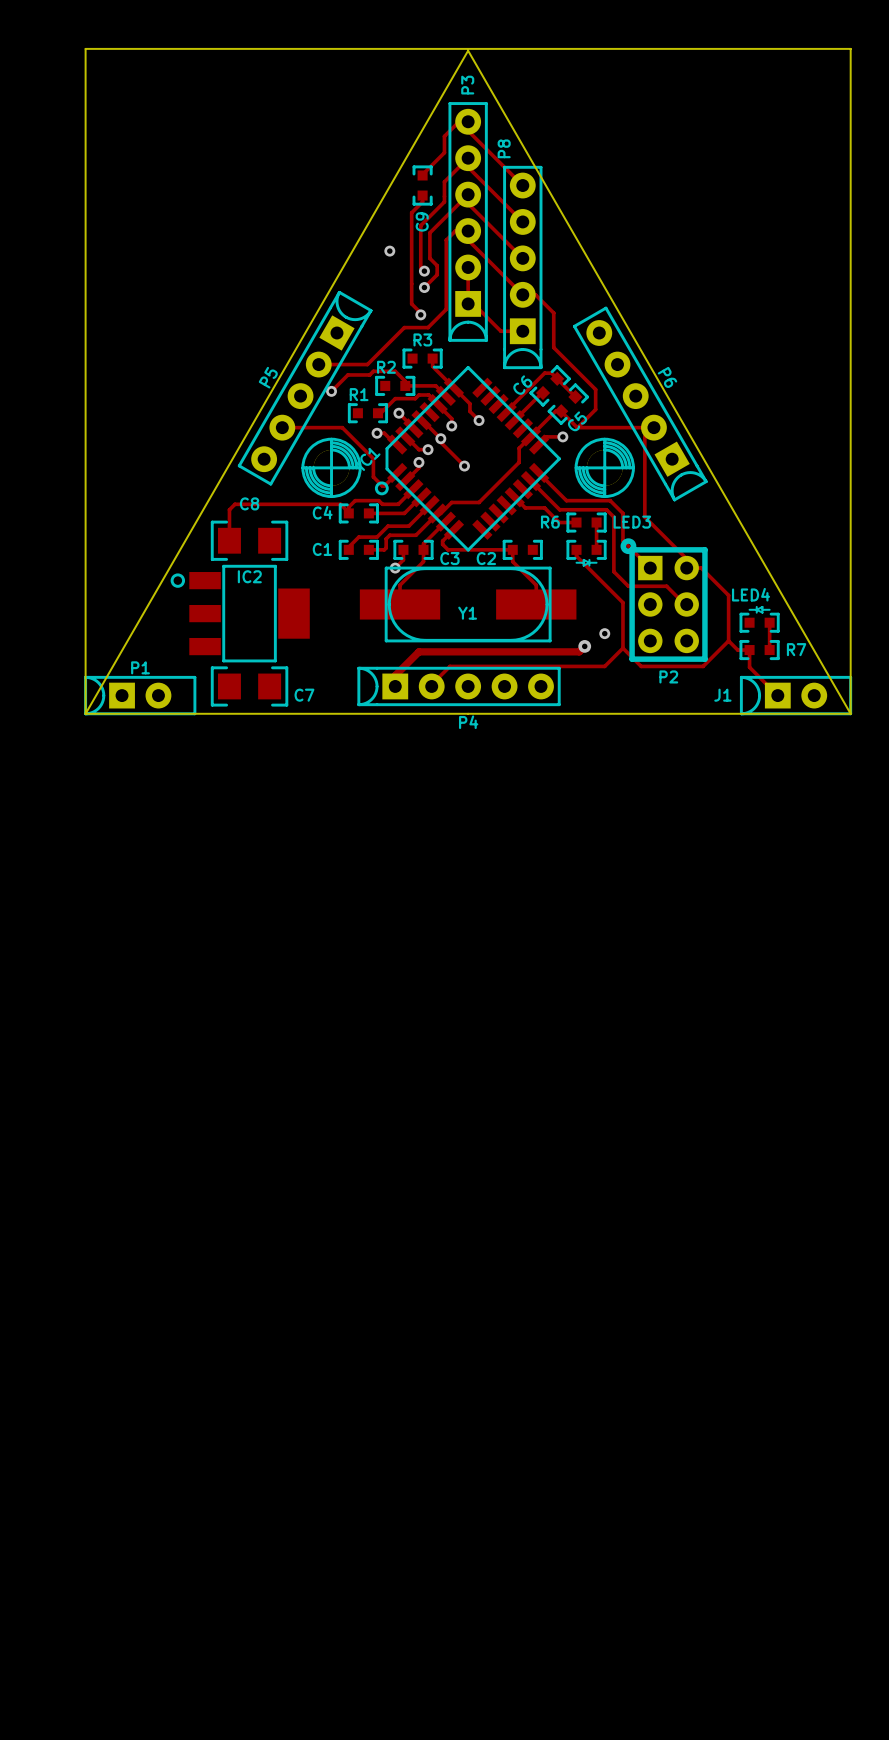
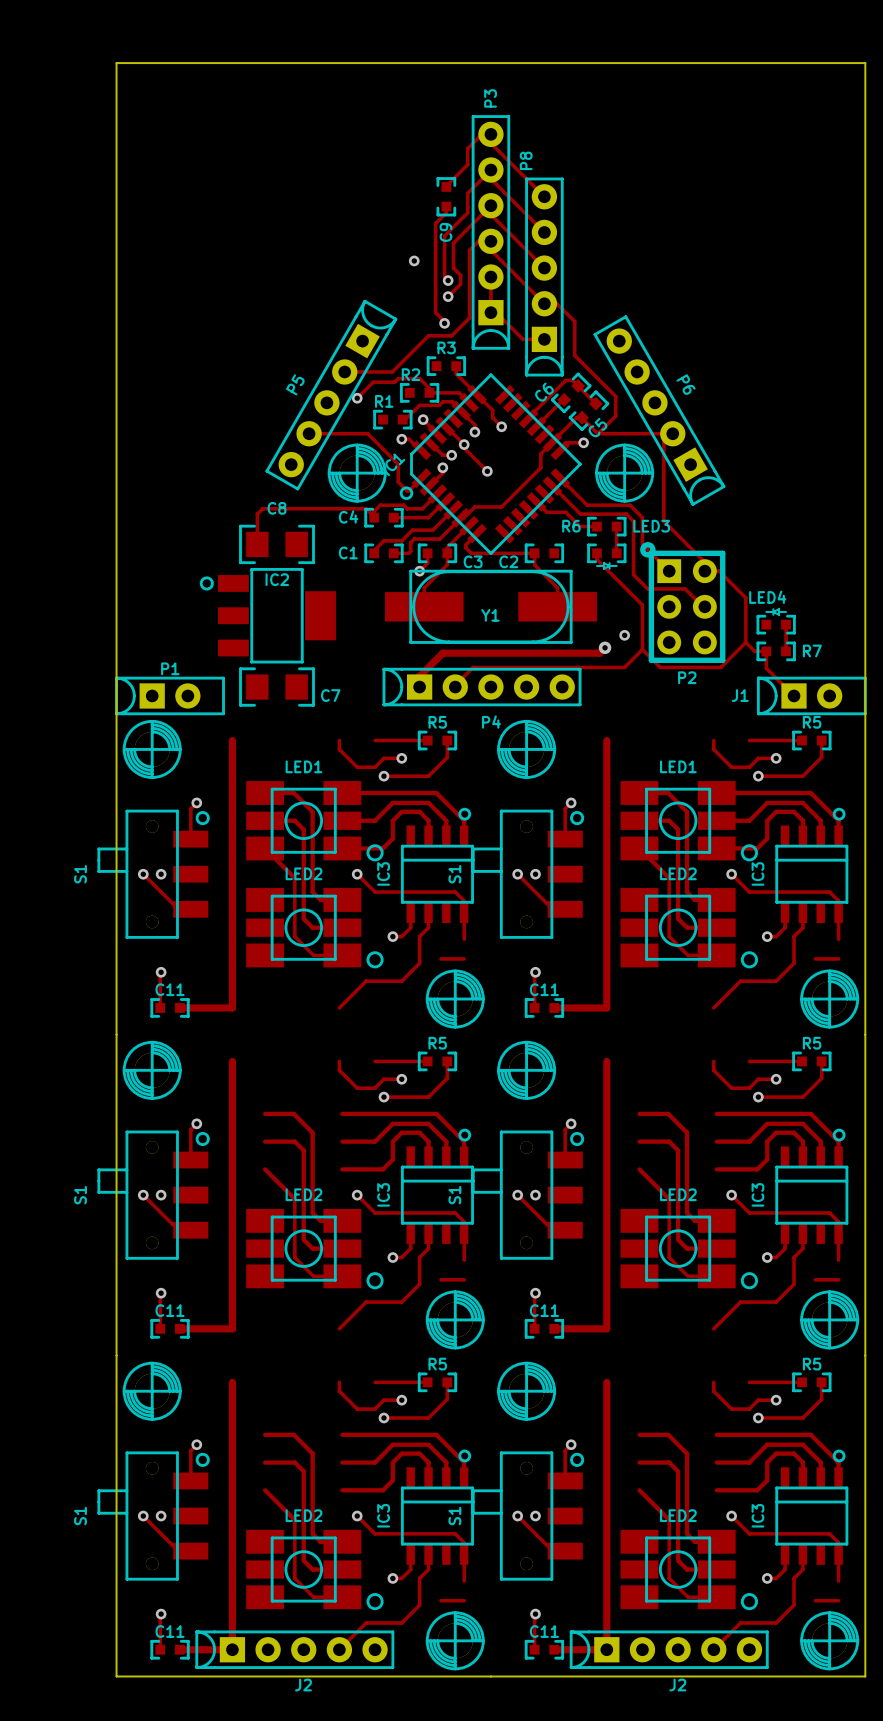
board edge: (468, 50) (85, 713) (850, 713) (468, 50) -> none
board edge: none -> (116, 713) (116, 1676) (865, 1676) (865, 713)
track: none -> (232, 740) (232, 1007) (179, 1007)
track: none -> (339, 740) (339, 749) (357, 767) (375, 767) (383, 758) (401, 758)
track: none -> (375, 740) (427, 740)
R5: none -> (437, 740)
track: none -> (447, 740) (447, 757) (428, 776) (383, 776)
track: none -> (606, 740) (606, 1007) (554, 1007)
track: none -> (713, 740) (713, 749) (731, 767) (749, 767) (758, 758) (776, 758)
track: none -> (749, 740) (802, 740)
R5: none -> (811, 740)
track: none -> (821, 740) (821, 757) (802, 776) (758, 776)
part: none -> (152, 749)
part: none -> (526, 749)
via: none -> (401, 758)
via: none -> (776, 758)
via: none -> (383, 776)
via: none -> (758, 776)
track: none -> (265, 793) (293, 793) (312, 811) (312, 892) (320, 899) (342, 899)
track: none -> (342, 793) (436, 793) (464, 820) (464, 836)
track: none -> (639, 793) (668, 793) (687, 811) (687, 892) (694, 899) (716, 899)
track: none -> (716, 793) (810, 793) (838, 820) (838, 836)
track: none -> (196, 802) (190, 808) (190, 839)
via: none -> (196, 802)
track: none -> (571, 802) (565, 808) (565, 839)
via: none -> (571, 802)
track: none -> (265, 820) (294, 820) (303, 829) (303, 918) (312, 927) (342, 927)
LED1: none -> (314, 821)
track: none -> (342, 820) (375, 820) (392, 802) (428, 802) (446, 820) (446, 836)
track: none -> (639, 820) (669, 820) (678, 829) (678, 918) (687, 927) (716, 927)
LED1: none -> (689, 821)
track: none -> (716, 820) (749, 820) (767, 802) (802, 802) (820, 820) (820, 836)
track: none -> (428, 836) (428, 820) (419, 811) (401, 811) (392, 820) (392, 838) (382, 848) (342, 848)
track: none -> (802, 836) (802, 820) (794, 811) (776, 811) (767, 820) (767, 838) (757, 848) (716, 848)
track: none -> (265, 848) (294, 878) (294, 936) (313, 955) (342, 955)
track: none -> (639, 848) (669, 878) (669, 936) (688, 955) (716, 955)
IC3: none -> (437, 865)
IC3: none -> (811, 865)
track: none -> (143, 874) (178, 909) (190, 909)
via: none -> (143, 874)
S1: none -> (153, 874)
via: none -> (161, 874)
track: none -> (357, 874) (375, 892) (455, 892) (464, 900) (464, 939)
via: none -> (357, 874)
track: none -> (517, 874) (552, 909) (565, 909)
via: none -> (517, 874)
S1: none -> (527, 874)
via: none -> (535, 874)
track: none -> (731, 874) (749, 892) (829, 892) (838, 900) (838, 939)
via: none -> (731, 874)
track: none -> (410, 912) (410, 927) (401, 936) (392, 936)
track: none -> (428, 912) (428, 927) (419, 936) (419, 963) (401, 981) (366, 981) (339, 1007)
track: none -> (785, 912) (785, 927) (776, 936) (767, 936)
track: none -> (802, 912) (802, 927) (794, 936) (794, 963) (776, 981) (740, 981) (713, 1007)
LED2: none -> (314, 928)
LED2: none -> (689, 928)
via: none -> (392, 936)
via: none -> (767, 936)
track: none -> (441, 958) (464, 958)
track: none -> (815, 958) (838, 958)
track: none -> (161, 972) (160, 1007)
via: none -> (161, 972)
track: none -> (535, 972) (534, 1007)
via: none -> (535, 972)
part: none -> (455, 999)
part: none -> (829, 999)
C11: none -> (170, 1007)
C11: none -> (544, 1007)
track: none -> (232, 1061) (232, 1328) (179, 1328)
track: none -> (339, 1061) (339, 1070) (357, 1088) (375, 1088) (383, 1079) (401, 1079)
track: none -> (375, 1061) (427, 1061)
R5: none -> (437, 1061)
track: none -> (447, 1061) (447, 1078) (428, 1097) (383, 1097)
track: none -> (606, 1061) (606, 1328) (554, 1328)
track: none -> (713, 1061) (713, 1070) (731, 1088) (749, 1088) (758, 1079) (776, 1079)
track: none -> (749, 1061) (802, 1061)
R5: none -> (811, 1061)
track: none -> (821, 1061) (821, 1078) (802, 1097) (758, 1097)
part: none -> (152, 1070)
part: none -> (526, 1070)
via: none -> (401, 1079)
via: none -> (776, 1079)
via: none -> (383, 1097)
via: none -> (758, 1097)
track: none -> (265, 1113) (293, 1113) (312, 1132) (312, 1212) (320, 1220) (342, 1220)
track: none -> (342, 1113) (436, 1113) (464, 1141) (464, 1157)
track: none -> (639, 1113) (668, 1113) (687, 1132) (687, 1212) (694, 1220) (716, 1220)
track: none -> (716, 1113) (810, 1113) (838, 1141) (838, 1157)
track: none -> (196, 1123) (190, 1129) (190, 1160)
via: none -> (196, 1123)
track: none -> (571, 1123) (565, 1129) (565, 1160)
via: none -> (571, 1123)
track: none -> (265, 1141) (294, 1141) (303, 1150) (303, 1239) (312, 1248) (342, 1248)
track: none -> (342, 1141) (375, 1141) (392, 1123) (428, 1123) (446, 1141) (446, 1157)
track: none -> (639, 1141) (669, 1141) (678, 1150) (678, 1239) (687, 1248) (716, 1248)
track: none -> (716, 1141) (749, 1141) (767, 1123) (802, 1123) (820, 1141) (820, 1157)
track: none -> (428, 1157) (428, 1141) (419, 1132) (401, 1132) (392, 1141) (392, 1159) (382, 1169) (342, 1169)
track: none -> (802, 1157) (802, 1141) (794, 1132) (776, 1132) (767, 1141) (767, 1159) (757, 1169) (716, 1169)
track: none -> (265, 1169) (294, 1199) (294, 1257) (313, 1276) (342, 1276)
track: none -> (639, 1169) (669, 1199) (669, 1257) (688, 1276) (716, 1276)
IC3: none -> (437, 1186)
IC3: none -> (811, 1186)
track: none -> (143, 1195) (178, 1230) (190, 1230)
via: none -> (143, 1195)
S1: none -> (153, 1195)
via: none -> (161, 1195)
track: none -> (357, 1195) (375, 1212) (455, 1212) (464, 1221) (464, 1260)
via: none -> (357, 1195)
track: none -> (517, 1195) (552, 1230) (565, 1230)
via: none -> (517, 1195)
S1: none -> (527, 1195)
via: none -> (535, 1195)
track: none -> (731, 1195) (749, 1212) (829, 1212) (838, 1221) (838, 1260)
via: none -> (731, 1195)
track: none -> (410, 1233) (410, 1248) (401, 1257) (392, 1257)
track: none -> (428, 1233) (428, 1248) (419, 1257) (419, 1284) (401, 1302) (366, 1302) (339, 1328)
track: none -> (785, 1233) (785, 1248) (776, 1257) (767, 1257)
track: none -> (802, 1233) (802, 1248) (794, 1257) (794, 1284) (776, 1302) (740, 1302) (713, 1328)
LED2: none -> (314, 1249)
LED2: none -> (689, 1249)
via: none -> (392, 1257)
via: none -> (767, 1257)
track: none -> (441, 1279) (464, 1279)
track: none -> (815, 1279) (838, 1279)
track: none -> (161, 1293) (160, 1328)
via: none -> (161, 1293)
track: none -> (535, 1293) (534, 1328)
via: none -> (535, 1293)
part: none -> (455, 1319)
part: none -> (829, 1319)
C11: none -> (170, 1328)
C11: none -> (544, 1328)
track: none -> (232, 1382) (232, 1649) (179, 1649)
track: none -> (339, 1382) (339, 1391) (357, 1409) (375, 1409) (383, 1400) (401, 1400)
track: none -> (375, 1382) (427, 1382)
R5: none -> (437, 1382)
track: none -> (447, 1382) (447, 1399) (428, 1417) (383, 1417)
track: none -> (606, 1382) (606, 1649) (554, 1649)
track: none -> (713, 1382) (713, 1391) (731, 1409) (749, 1409) (758, 1400) (776, 1400)
track: none -> (749, 1382) (802, 1382)
R5: none -> (811, 1382)
track: none -> (821, 1382) (821, 1399) (802, 1417) (758, 1417)
part: none -> (152, 1391)
part: none -> (526, 1391)
via: none -> (401, 1400)
via: none -> (776, 1400)
via: none -> (383, 1417)
via: none -> (758, 1417)
track: none -> (265, 1434) (293, 1434) (312, 1453) (312, 1533) (320, 1541) (342, 1541)
track: none -> (342, 1434) (436, 1434) (464, 1462) (464, 1478)
track: none -> (639, 1434) (668, 1434) (687, 1453) (687, 1533) (694, 1541) (716, 1541)
track: none -> (716, 1434) (810, 1434) (838, 1462) (838, 1478)
track: none -> (196, 1444) (190, 1450) (190, 1480)
via: none -> (196, 1444)
track: none -> (571, 1444) (565, 1450) (565, 1480)
via: none -> (571, 1444)
track: none -> (265, 1462) (294, 1462) (303, 1471) (303, 1560) (312, 1569) (342, 1569)
track: none -> (342, 1462) (375, 1462) (392, 1444) (428, 1444) (446, 1462) (446, 1478)
track: none -> (639, 1462) (669, 1462) (678, 1471) (678, 1560) (687, 1569) (716, 1569)
track: none -> (716, 1462) (749, 1462) (767, 1444) (802, 1444) (820, 1462) (820, 1478)
track: none -> (428, 1478) (428, 1462) (419, 1453) (401, 1453) (392, 1462) (392, 1480) (382, 1490) (342, 1490)
track: none -> (802, 1478) (802, 1462) (794, 1453) (776, 1453) (767, 1462) (767, 1480) (757, 1490) (716, 1490)
track: none -> (265, 1490) (294, 1519) (294, 1578) (313, 1597) (342, 1597)
track: none -> (639, 1490) (669, 1519) (669, 1578) (688, 1597) (716, 1597)
IC3: none -> (437, 1507)
IC3: none -> (811, 1507)
track: none -> (143, 1516) (178, 1551) (190, 1551)
via: none -> (143, 1516)
S1: none -> (153, 1516)
via: none -> (161, 1516)
track: none -> (357, 1516) (375, 1533) (455, 1533) (464, 1542) (464, 1581)
via: none -> (357, 1516)
track: none -> (517, 1516) (552, 1551) (565, 1551)
via: none -> (517, 1516)
S1: none -> (527, 1516)
via: none -> (535, 1516)
track: none -> (731, 1516) (749, 1533) (829, 1533) (838, 1542) (838, 1581)
via: none -> (731, 1516)
track: none -> (410, 1553) (410, 1569) (401, 1578) (392, 1578)
track: none -> (428, 1553) (428, 1569) (419, 1578) (419, 1605) (401, 1623) (366, 1623) (339, 1649)
track: none -> (785, 1553) (785, 1569) (776, 1578) (767, 1578)
track: none -> (802, 1553) (802, 1569) (794, 1578) (794, 1605) (776, 1623) (740, 1623) (713, 1649)
LED2: none -> (314, 1570)
LED2: none -> (689, 1570)
via: none -> (392, 1578)
via: none -> (767, 1578)
track: none -> (441, 1600) (464, 1600)
track: none -> (815, 1600) (838, 1600)
track: none -> (161, 1614) (160, 1649)
via: none -> (161, 1614)
track: none -> (535, 1614) (534, 1649)
via: none -> (535, 1614)
part: none -> (455, 1640)
part: none -> (829, 1640)
C11: none -> (170, 1649)
J2: none -> (294, 1649)
C11: none -> (544, 1649)
J2: none -> (669, 1649)

